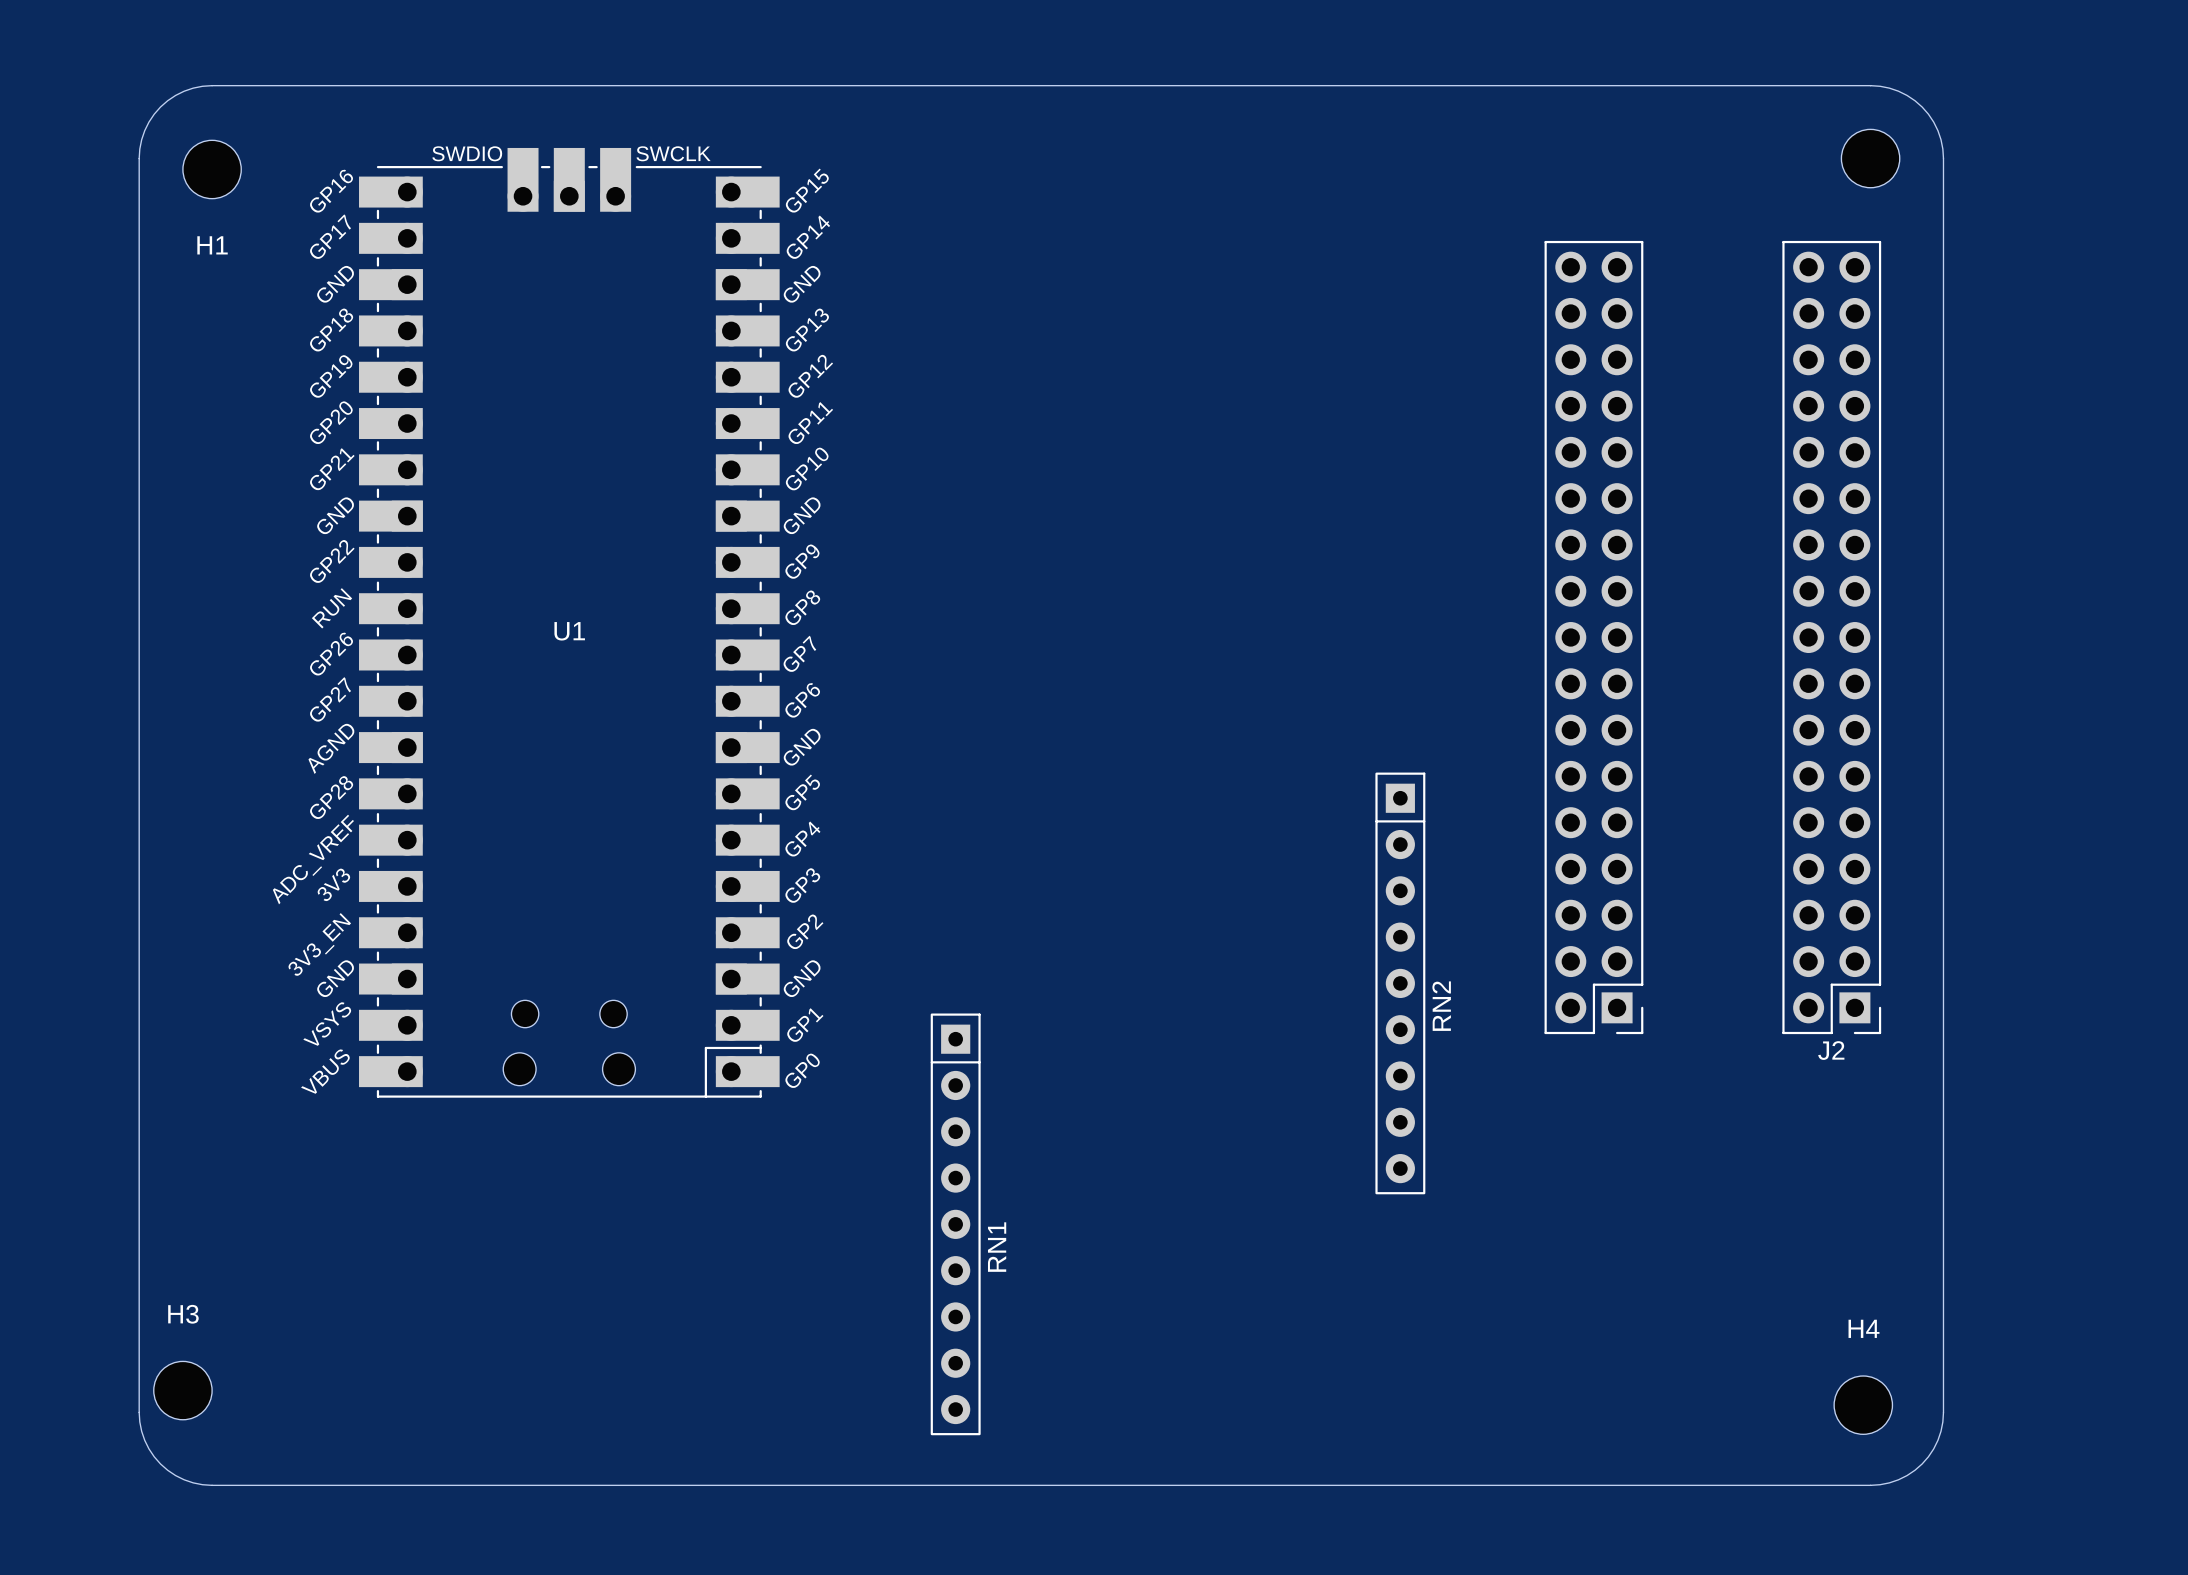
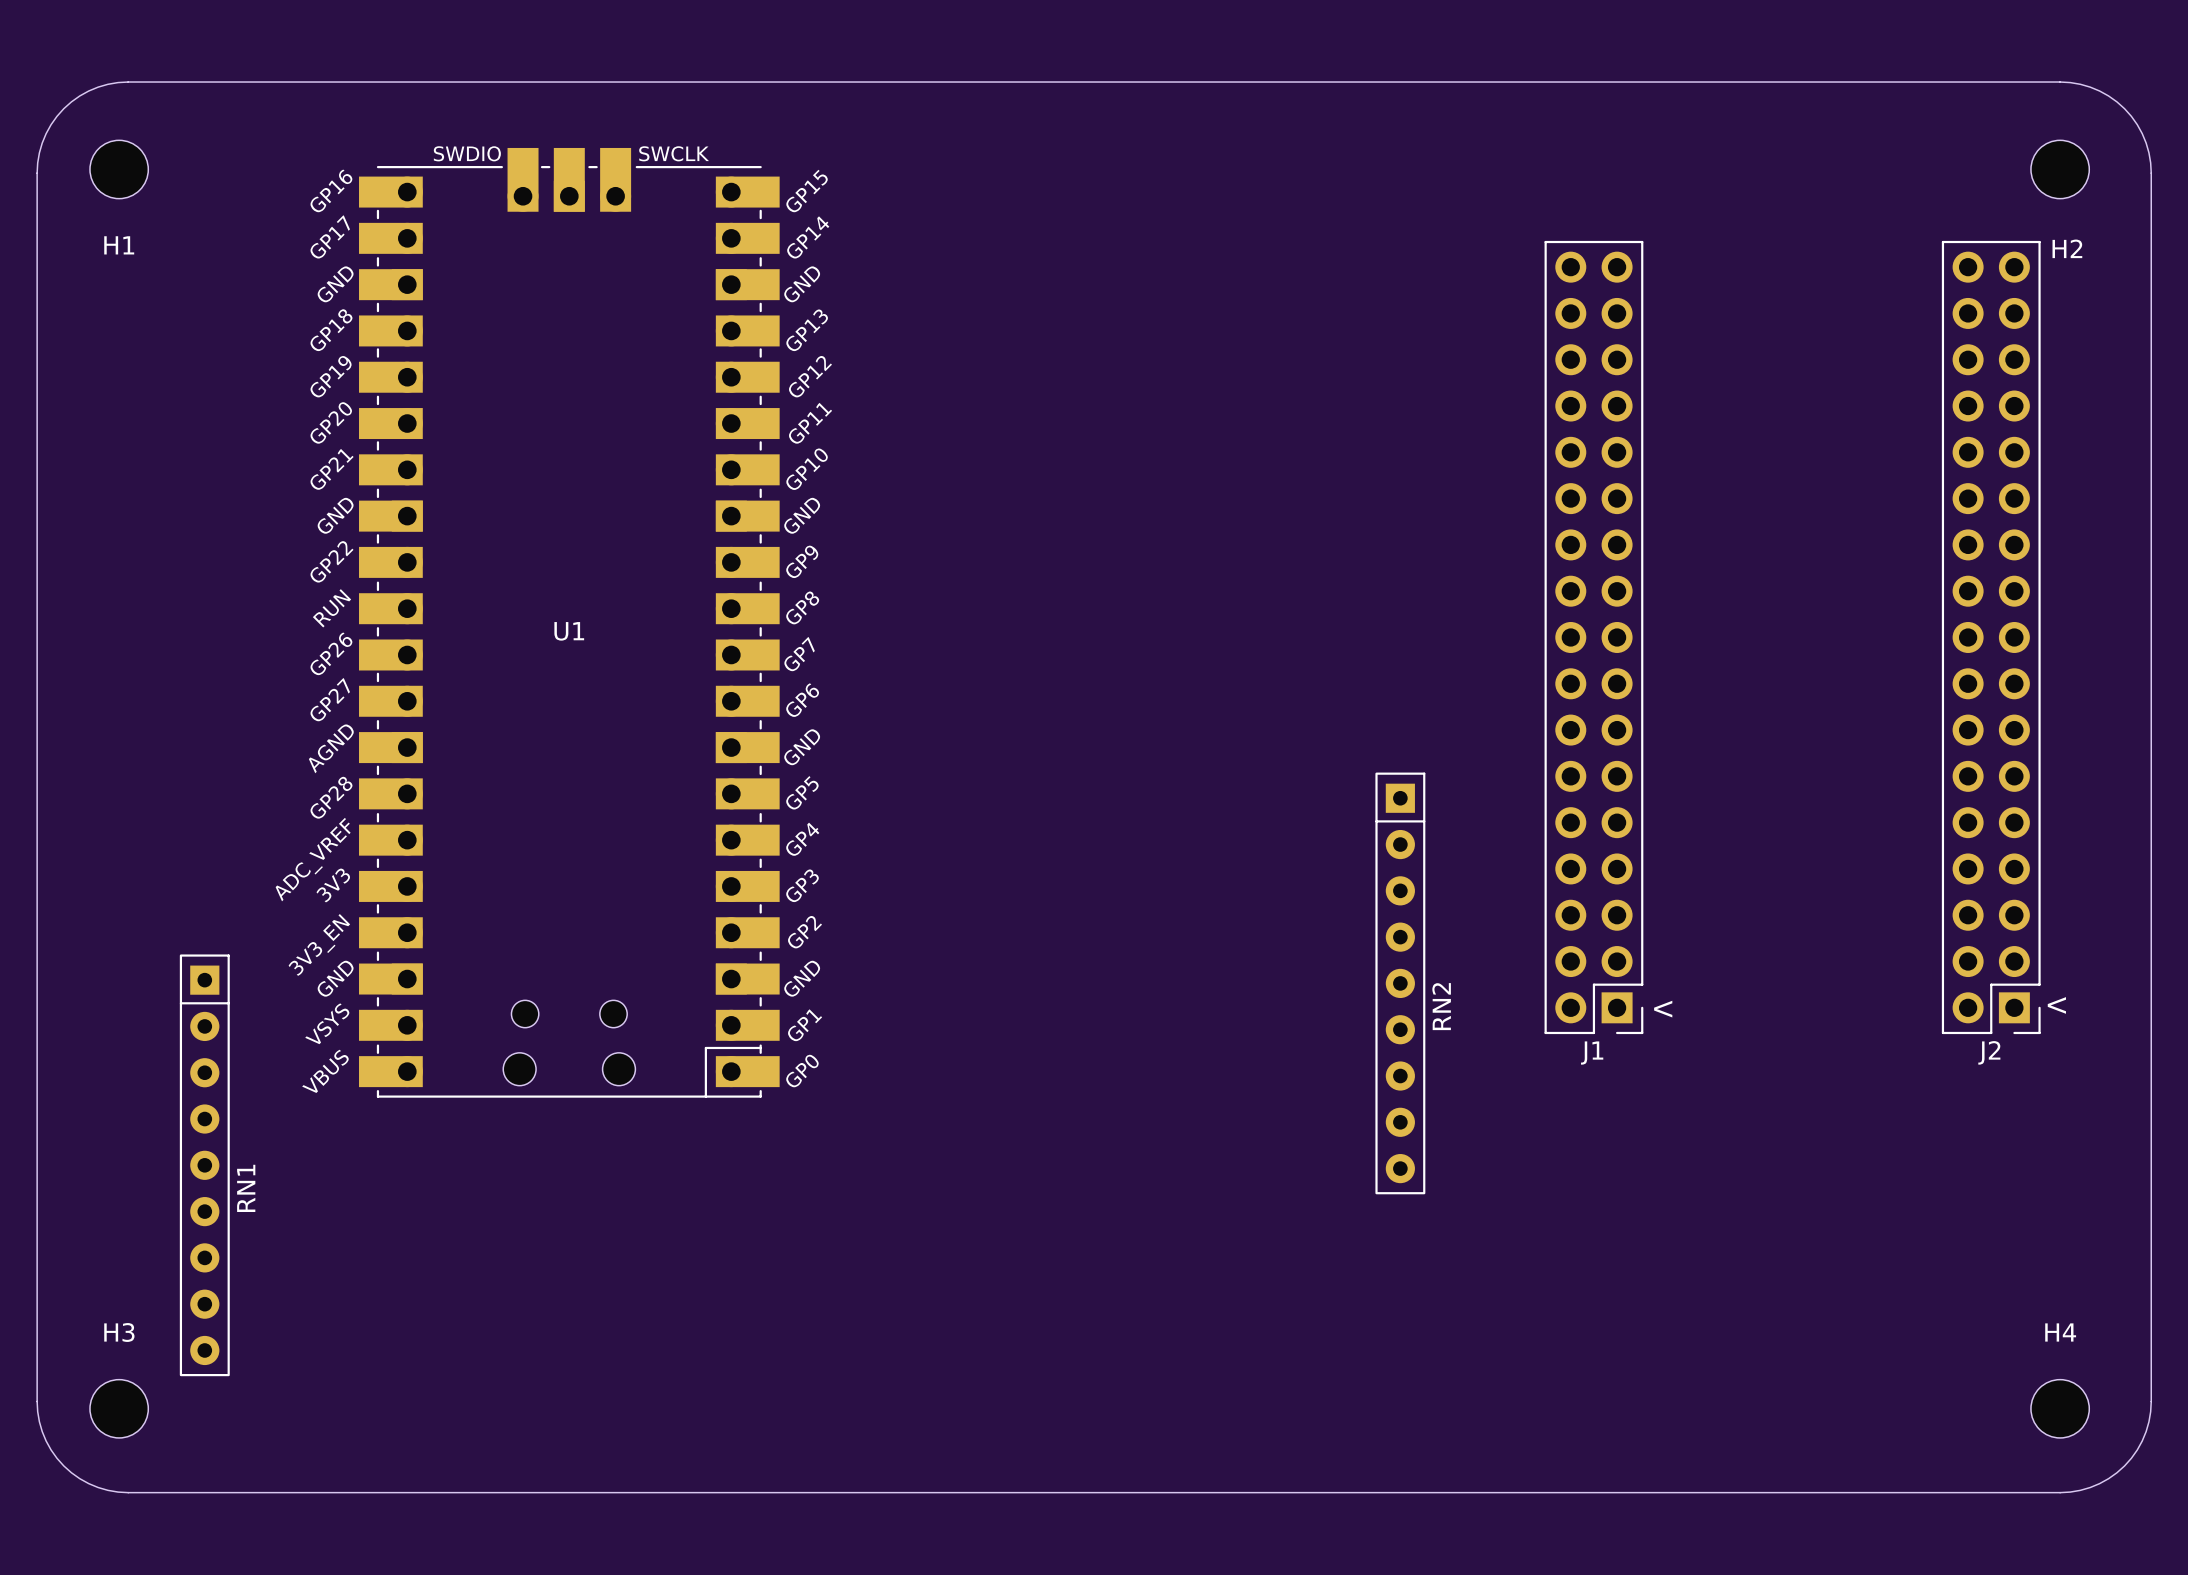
board edge: (212, 85) (1870, 85) (1898, 91) (1914, 100) (1933, 122) (1940, 139) (1943, 158) (1943, 1412) (1940, 1431) (1928, 1456) (1914, 1470) (1898, 1479) (1870, 1485) (212, 1485) (184, 1479) (167, 1470) (148, 1448) (141, 1431) (139, 1412) (139, 158) (144, 130) (160, 107) (184, 91) (212, 85) -> (128, 82) (107, 84) (88, 91) (63, 108) (46, 133) (39, 152) (37, 173) (37, 1401) (39, 1421) (46, 1441) (63, 1465) (79, 1478) (98, 1487) (128, 1492) (2060, 1492) (2090, 1487) (2108, 1478) (2124, 1465) (2137, 1449) (2148, 1421) (2151, 1401) (2151, 173) (2146, 143) (2137, 124) (2124, 108) (2108, 95) (2080, 84) (2060, 82) (128, 82)
part: (1870, 158) -> none
H1 position: (212, 169) -> (119, 169)
H2: none -> (2060, 169)
J2 position: (1831, 637) -> (1991, 637)
text: none -> V (2056, 1005)
text: none -> V (1663, 1009)
J1 name: none -> J1 (1592, 1053)
RN1 position: (955, 1224) -> (204, 1165)
H3 position: (182, 1390) -> (119, 1408)
H4 position: (1863, 1405) -> (2060, 1408)

